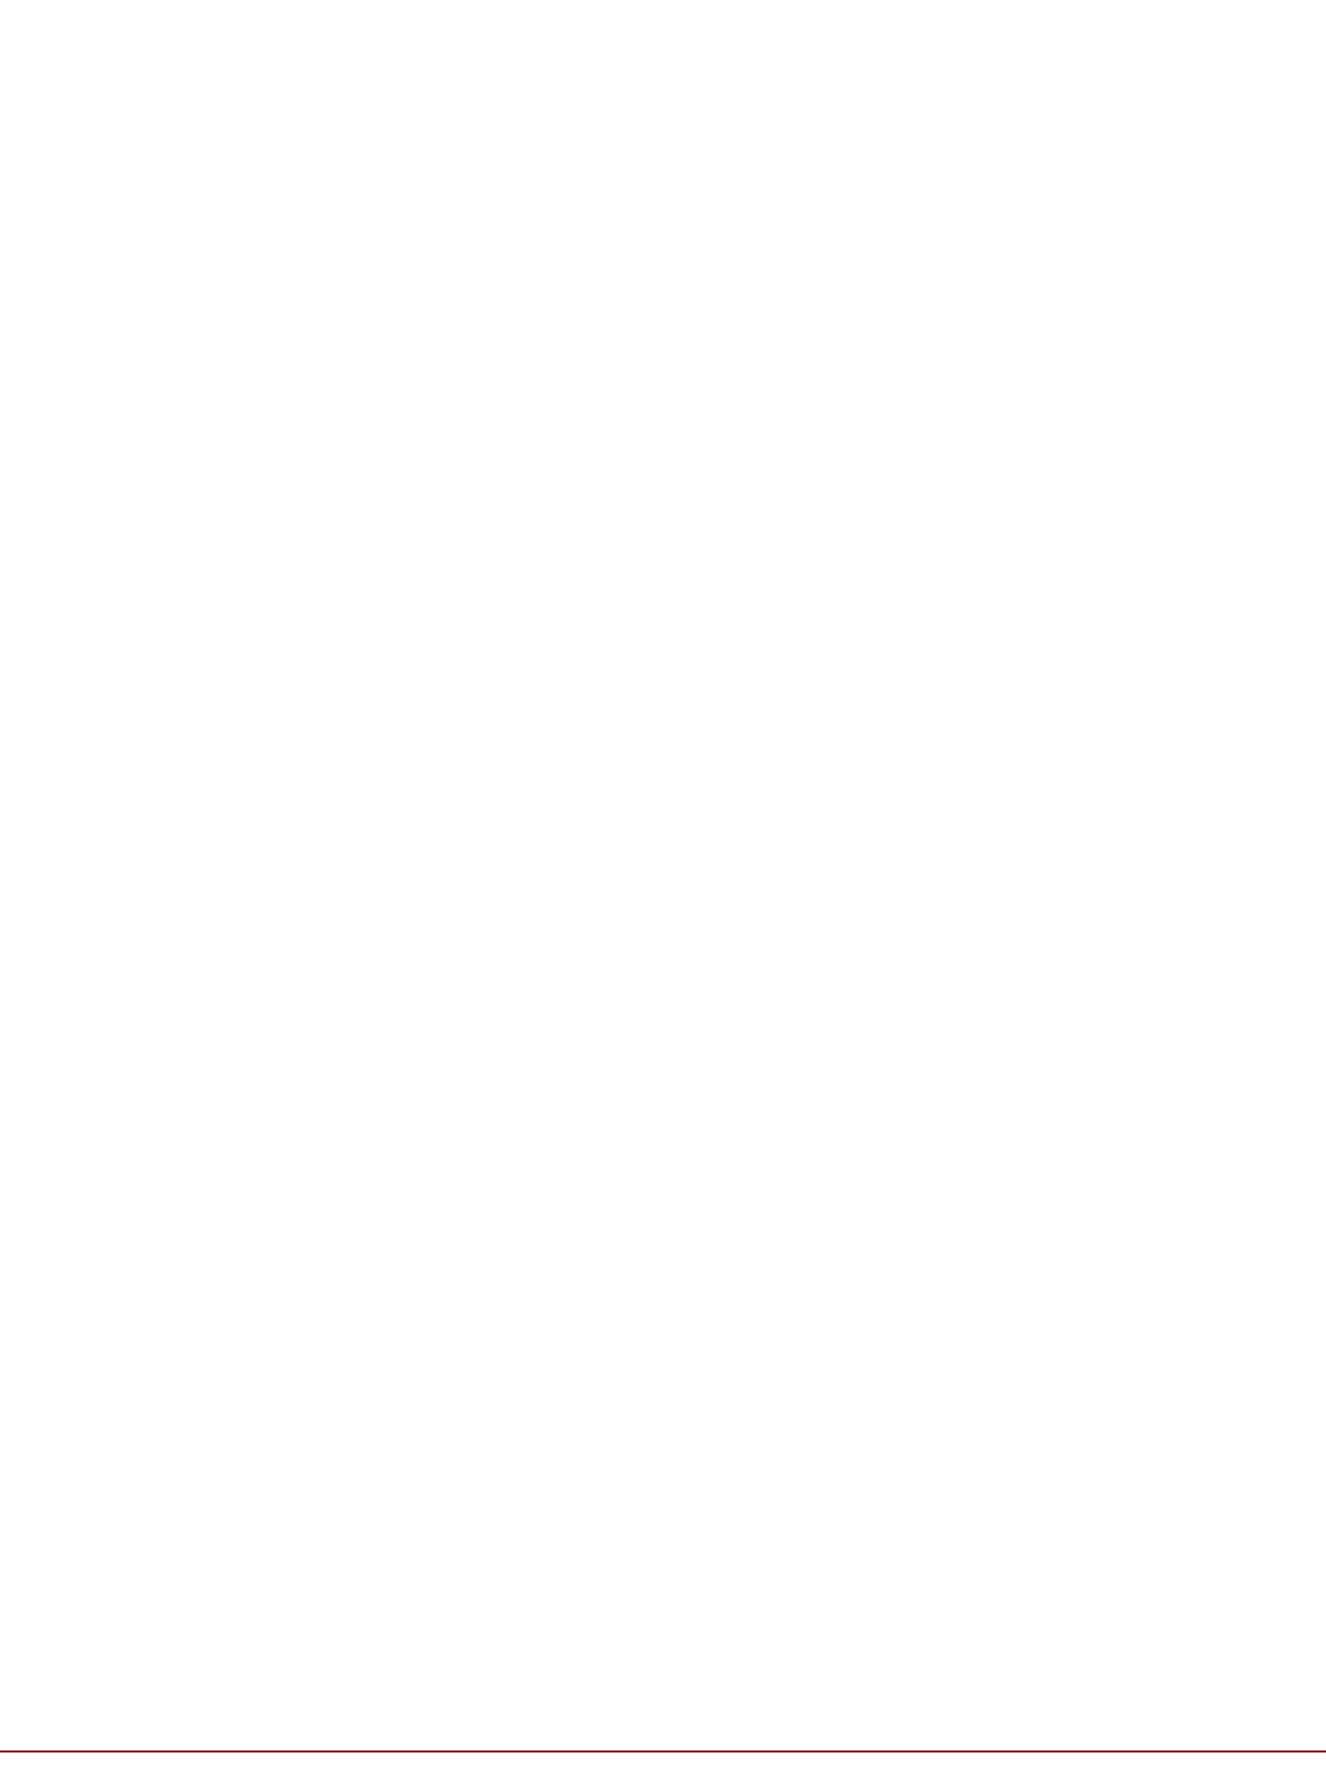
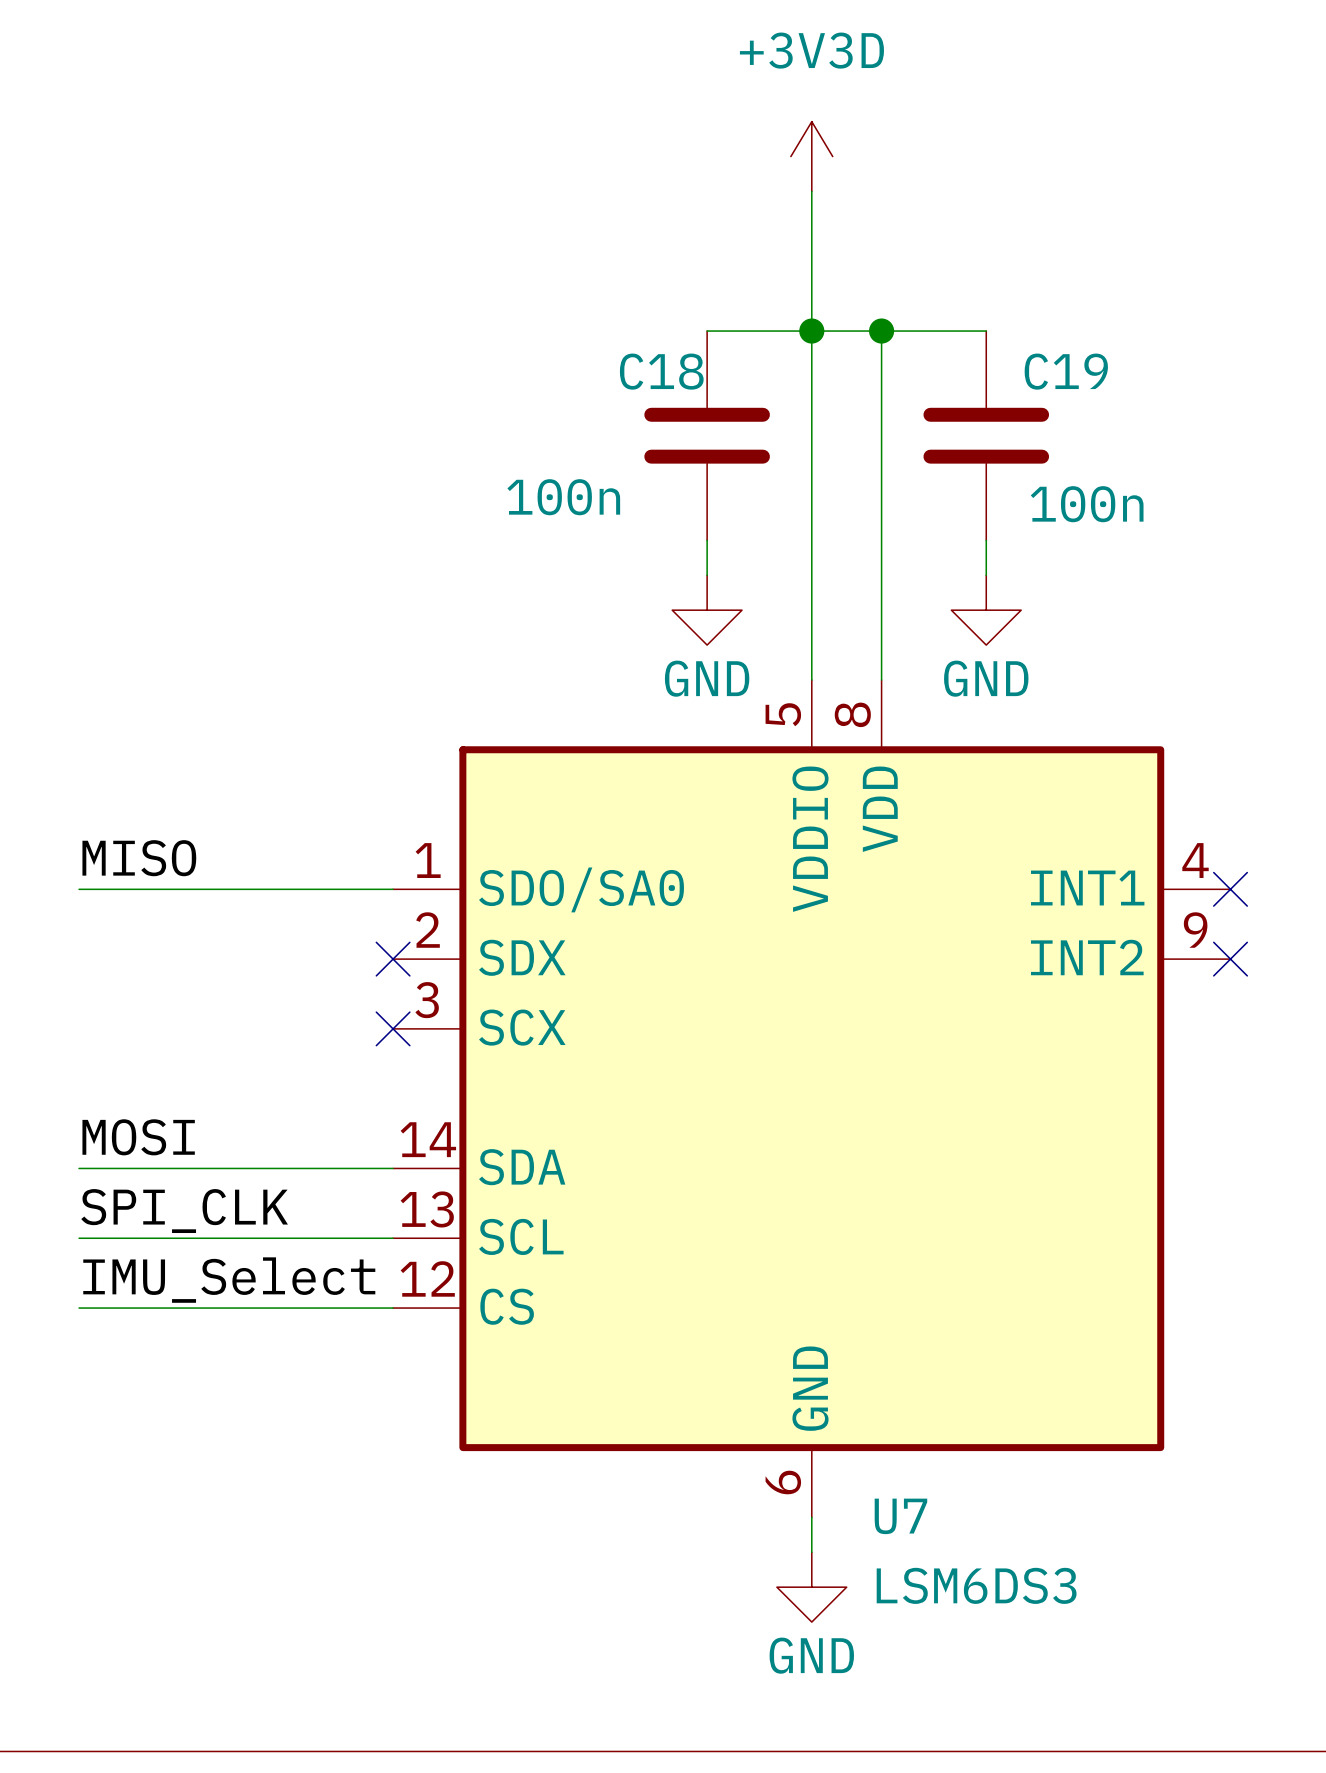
power symbol: none -> +3V3D (811, 156)
wire: none -> (811, 191) (811, 679)
wire: none -> (707, 331) (986, 331)
junction: none -> (811, 331)
wire: none -> (881, 331) (881, 679)
junction: none -> (881, 331)
C18: none -> 100n (707, 435)
C19: none -> 100n (986, 435)
wire: none -> (707, 540) (707, 575)
wire: none -> (986, 540) (986, 575)
power symbol: none -> GND (707, 610)
power symbol: none -> GND (986, 610)
label: none -> MISO (139, 858)
wire: none -> (79, 889) (393, 889)
no-connect mark: none -> (1230, 889)
no-connect mark: none -> (393, 959)
no-connect mark: none -> (1230, 959)
no-connect mark: none -> (393, 1028)
U7: none -> LSM6DS3 (811, 1098)
label: none -> MOSI (138, 1137)
wire: none -> (79, 1168) (393, 1168)
label: none -> SPI_CLK (184, 1211)
wire: none -> (79, 1238) (393, 1238)
label: none -> IMU_Select (229, 1280)
wire: none -> (79, 1308) (393, 1308)
wire: none -> (811, 1517) (811, 1552)
power symbol: none -> GND (811, 1587)

